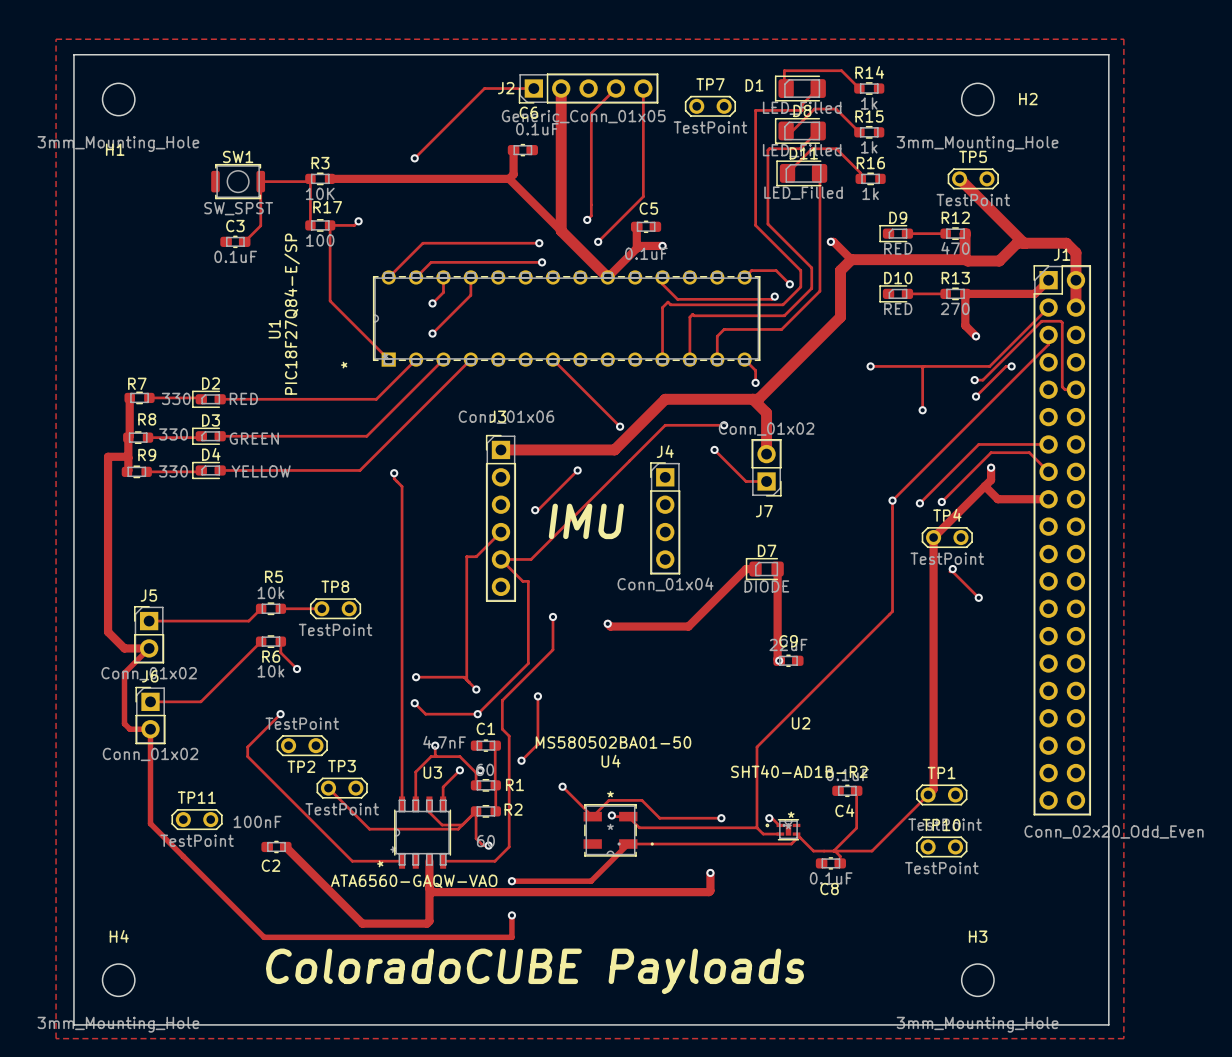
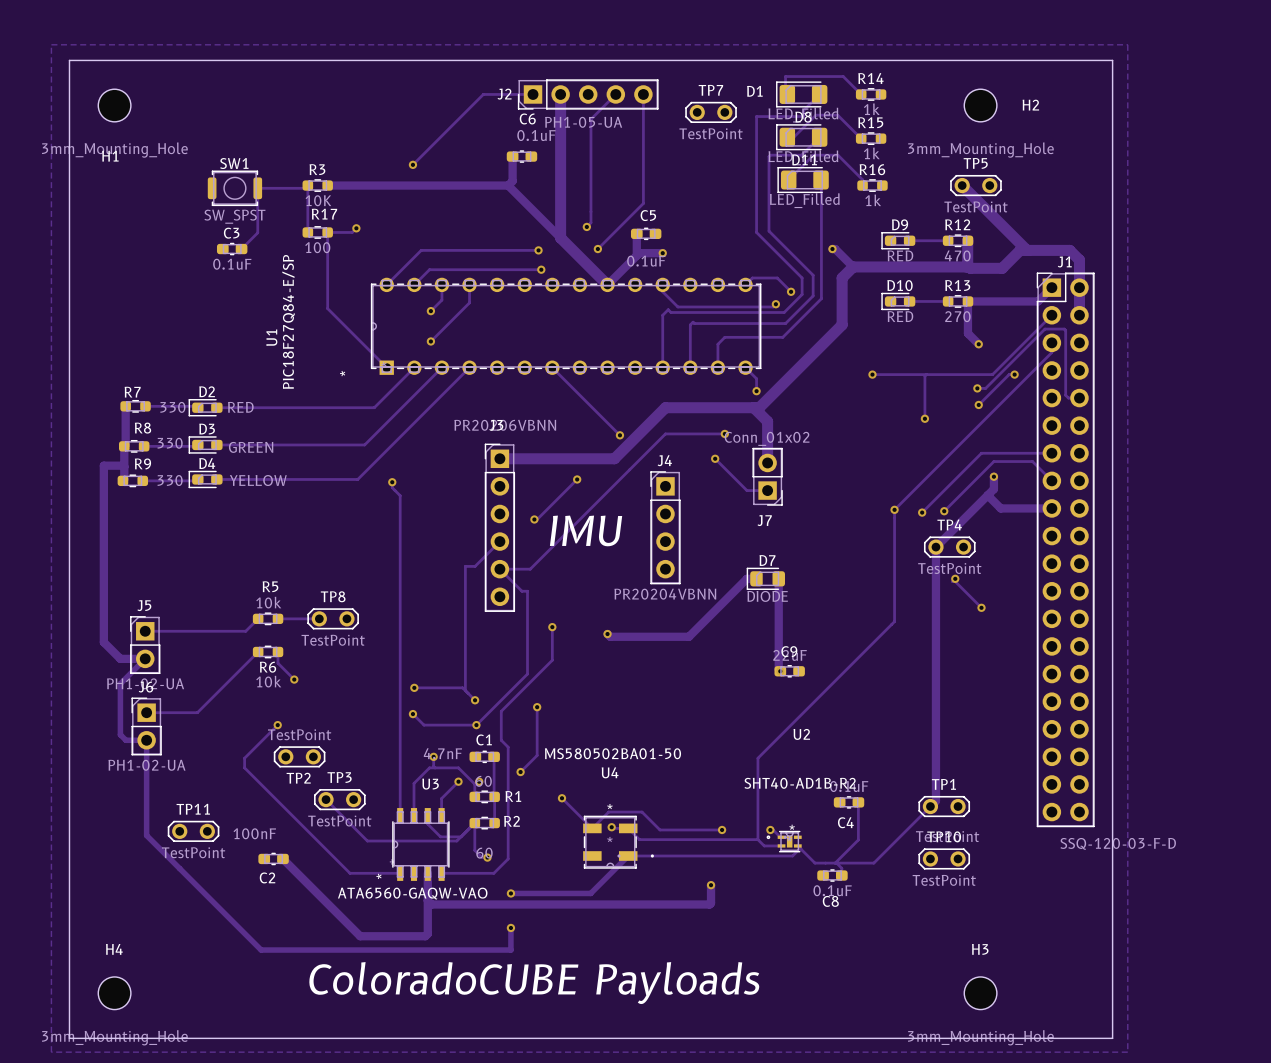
J2 value: Generic_Conn_01x05 (583, 116) -> PH1-05-UA (583, 122)
J3 value: Conn_01x06 (506, 417) -> PR20206VBNN (505, 425)
J4 value: Conn_01x04 (665, 584) -> PR20204VBNN (665, 594)
J5 value: Conn_01x02 (149, 673) -> PH1-02-UA (145, 683)
J6 value: Conn_01x02 (150, 754) -> PH1-02-UA (146, 765)
J1 value: Conn_02x20_Odd_Even (1114, 832) -> SSQ-120-03-F-D (1118, 843)

